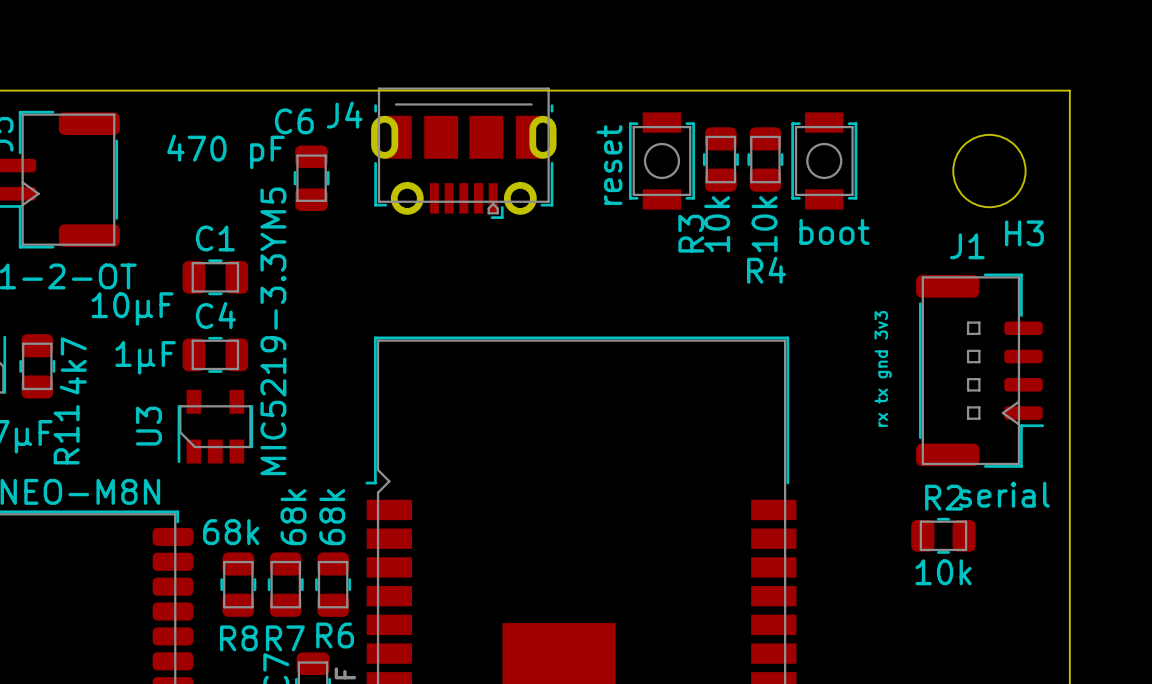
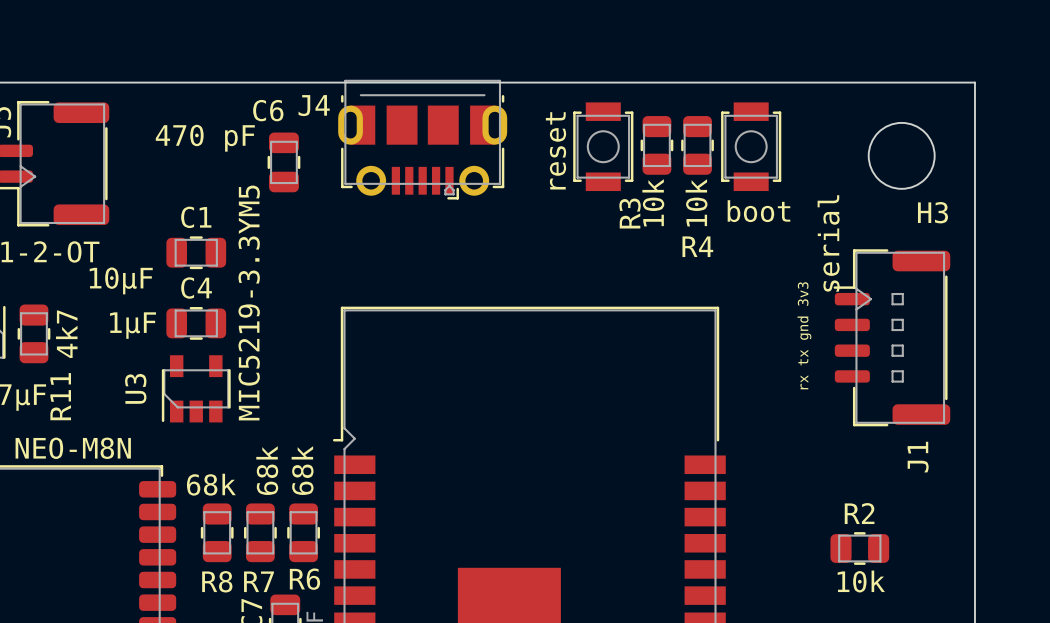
J1 rotation: 0° (980, 370) -> 180° (891, 337)
J1 value position: serial (1004, 494) -> serial (828, 243)
R2 position: (943, 535) -> (859, 548)

